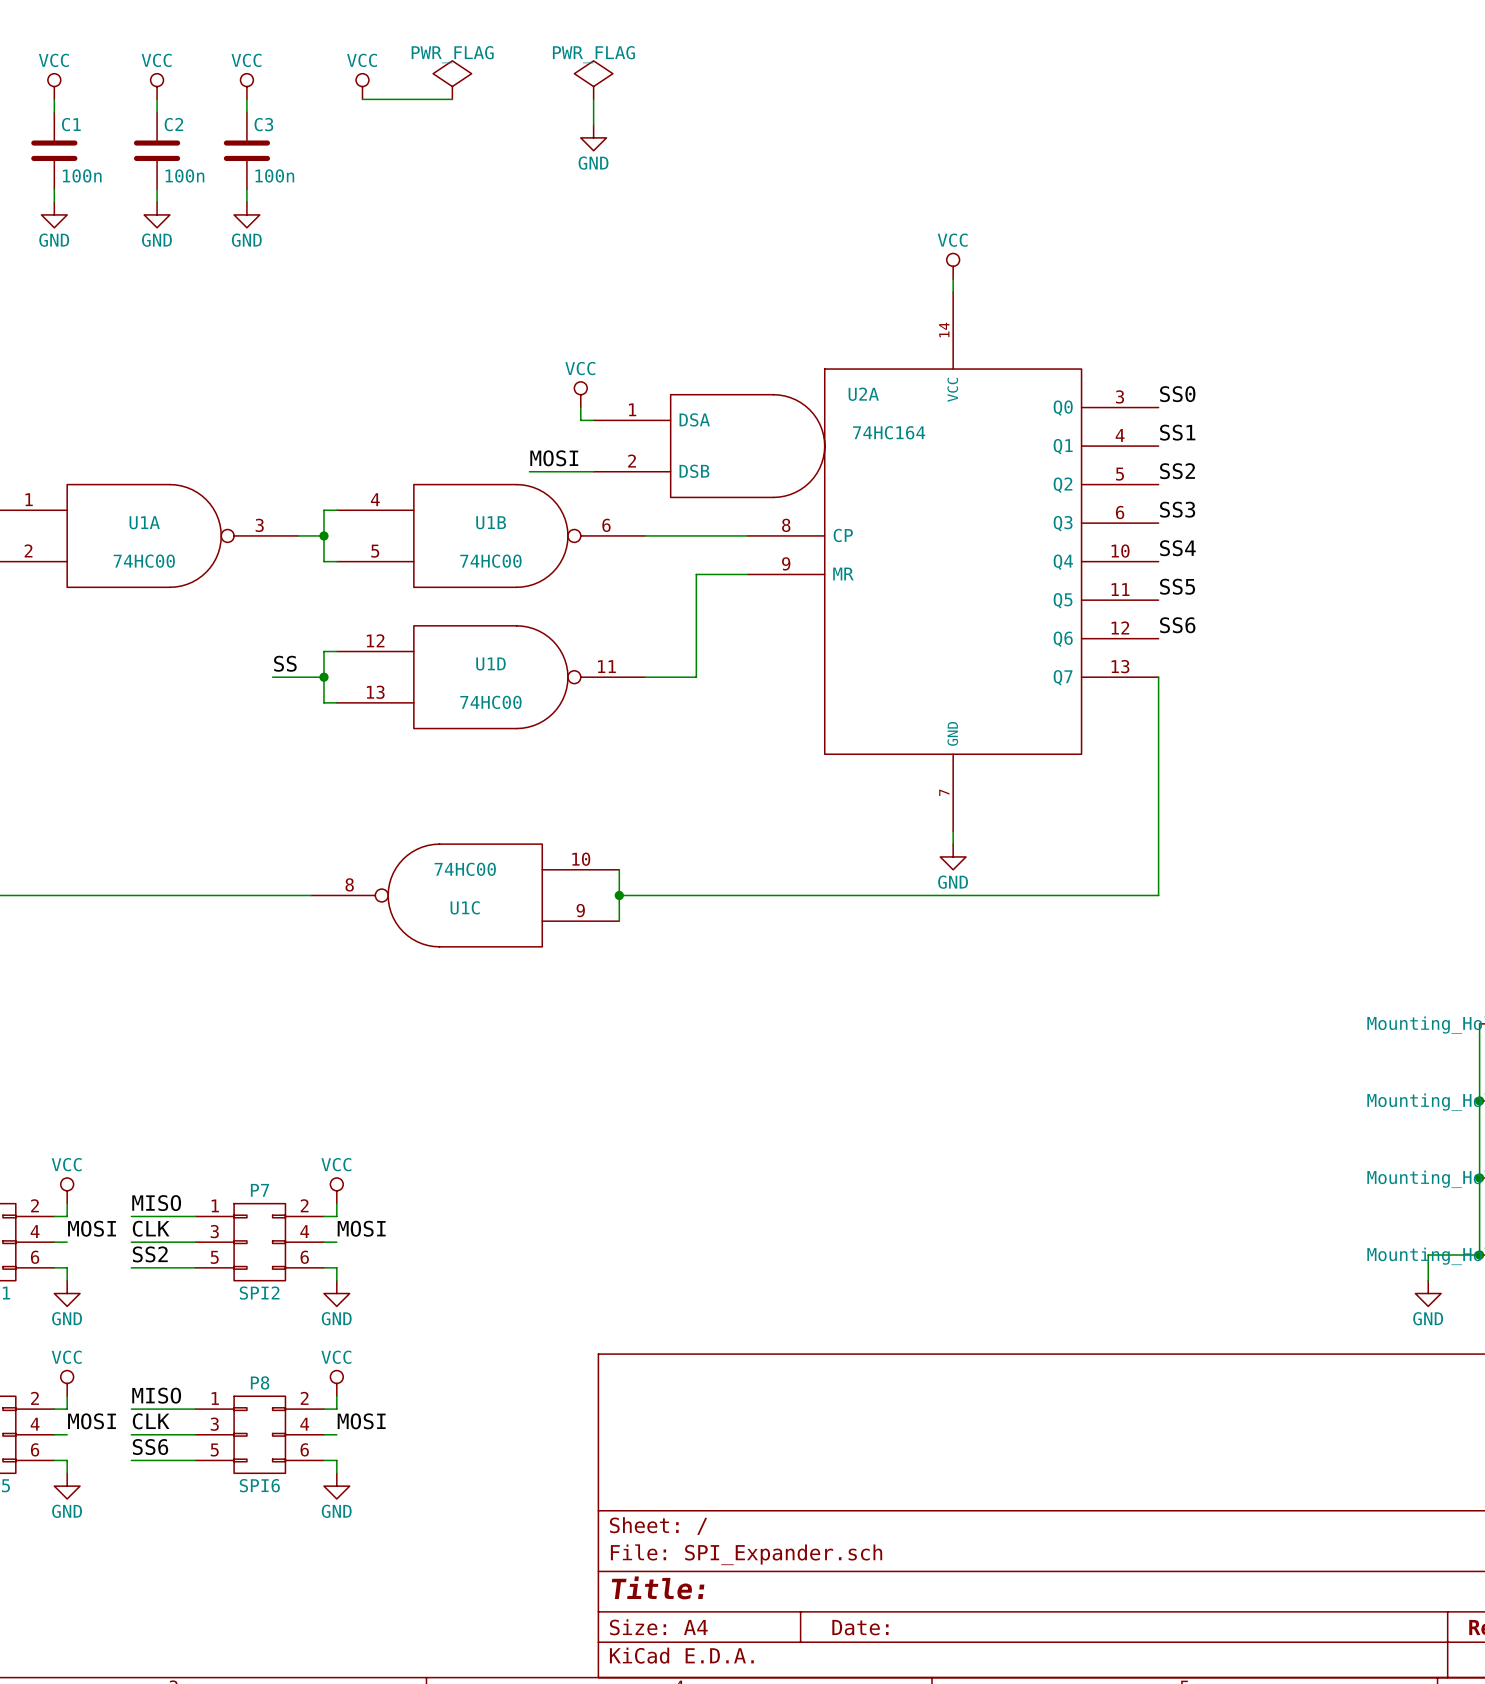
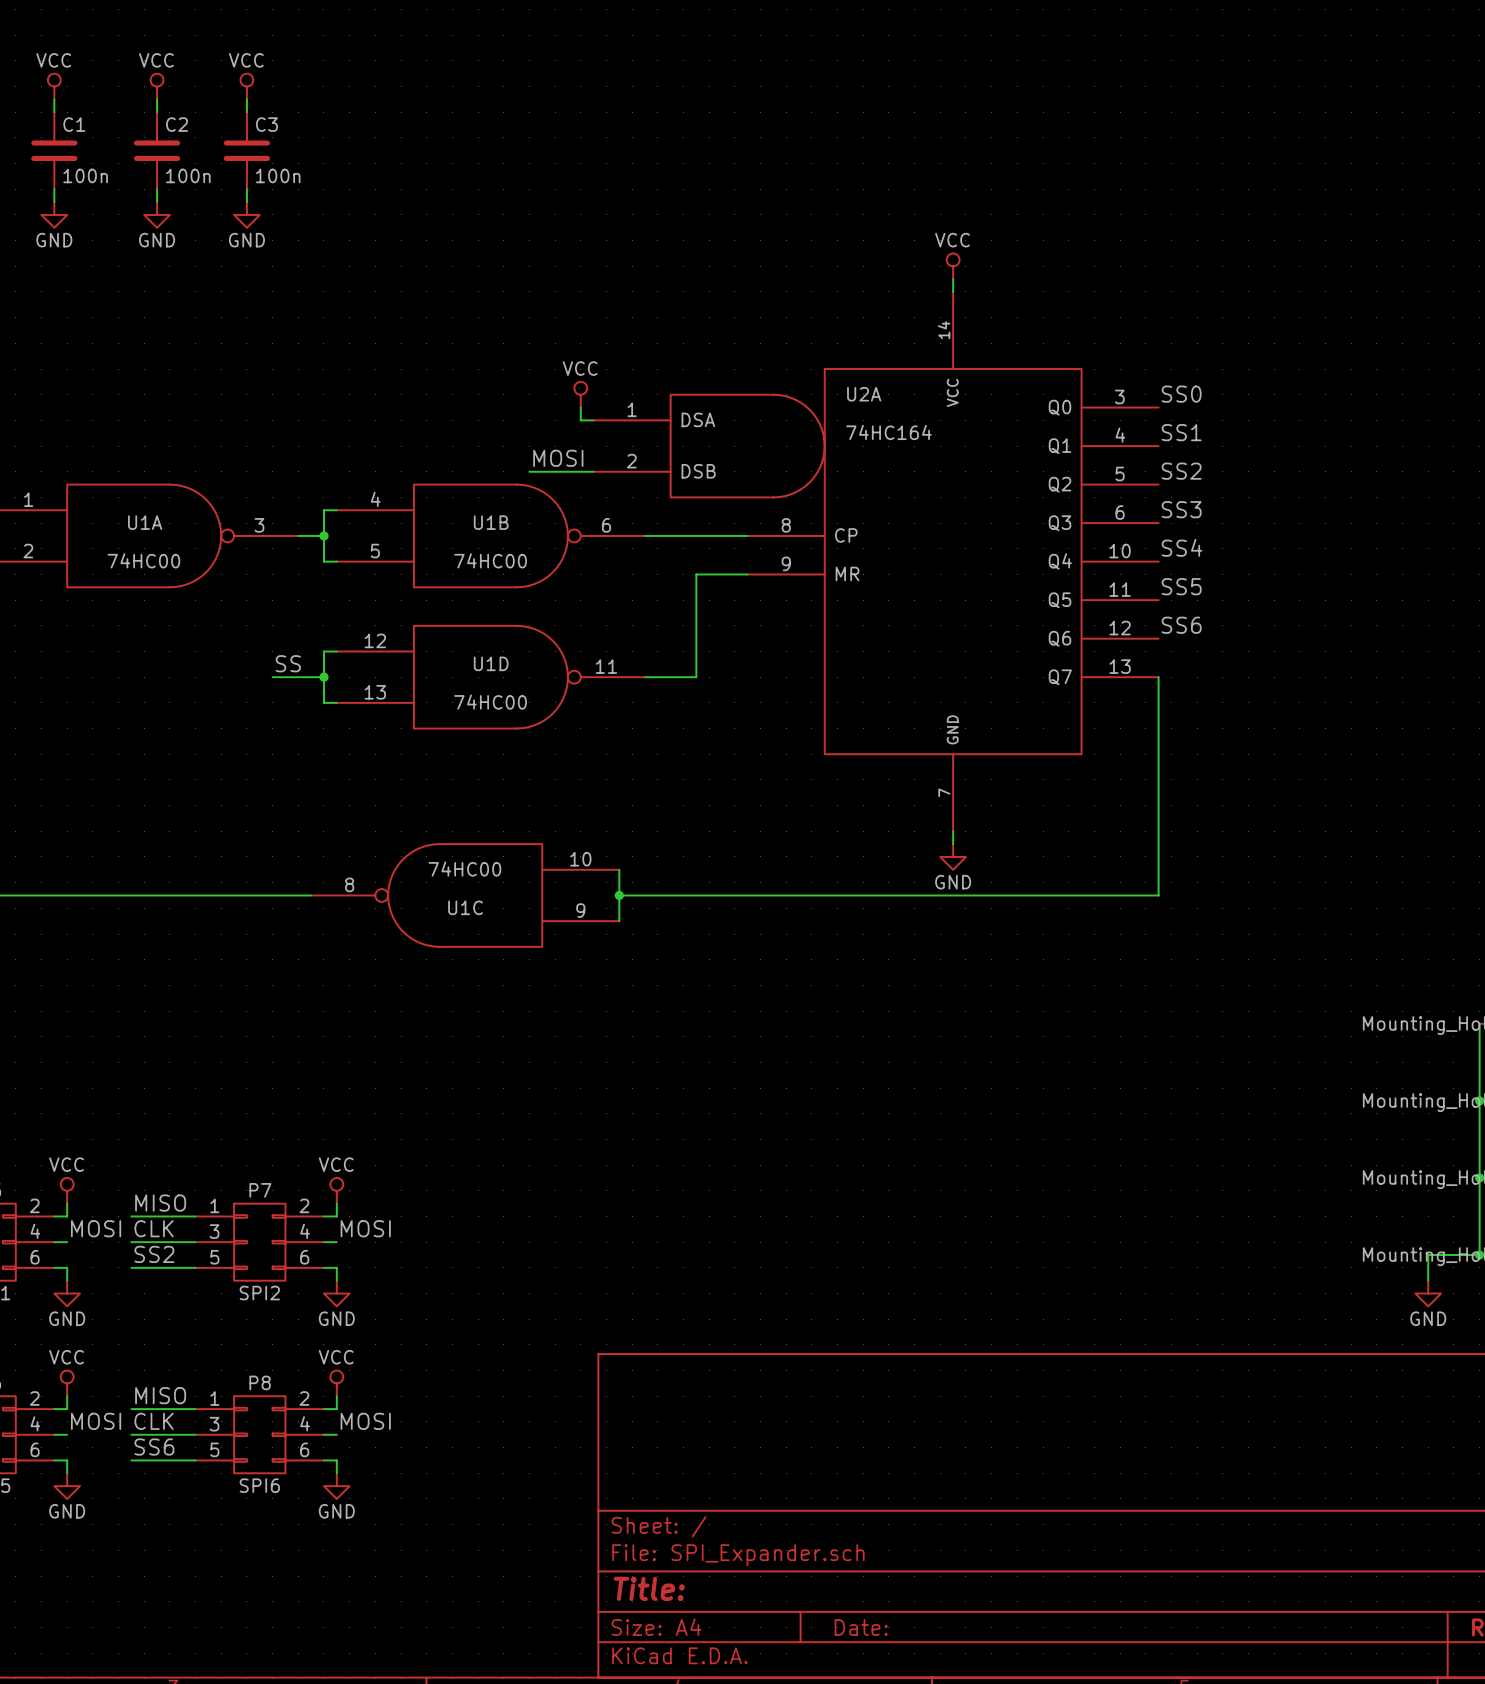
power symbol: PWR_FLAG (452, 80) -> none
power symbol: PWR_FLAG (593, 80) -> none
power symbol: VCC (362, 86) -> none
wire: (362, 99) (452, 99) -> none
wire: (593, 99) (593, 125) -> none
power symbol: GND (593, 137) -> none

